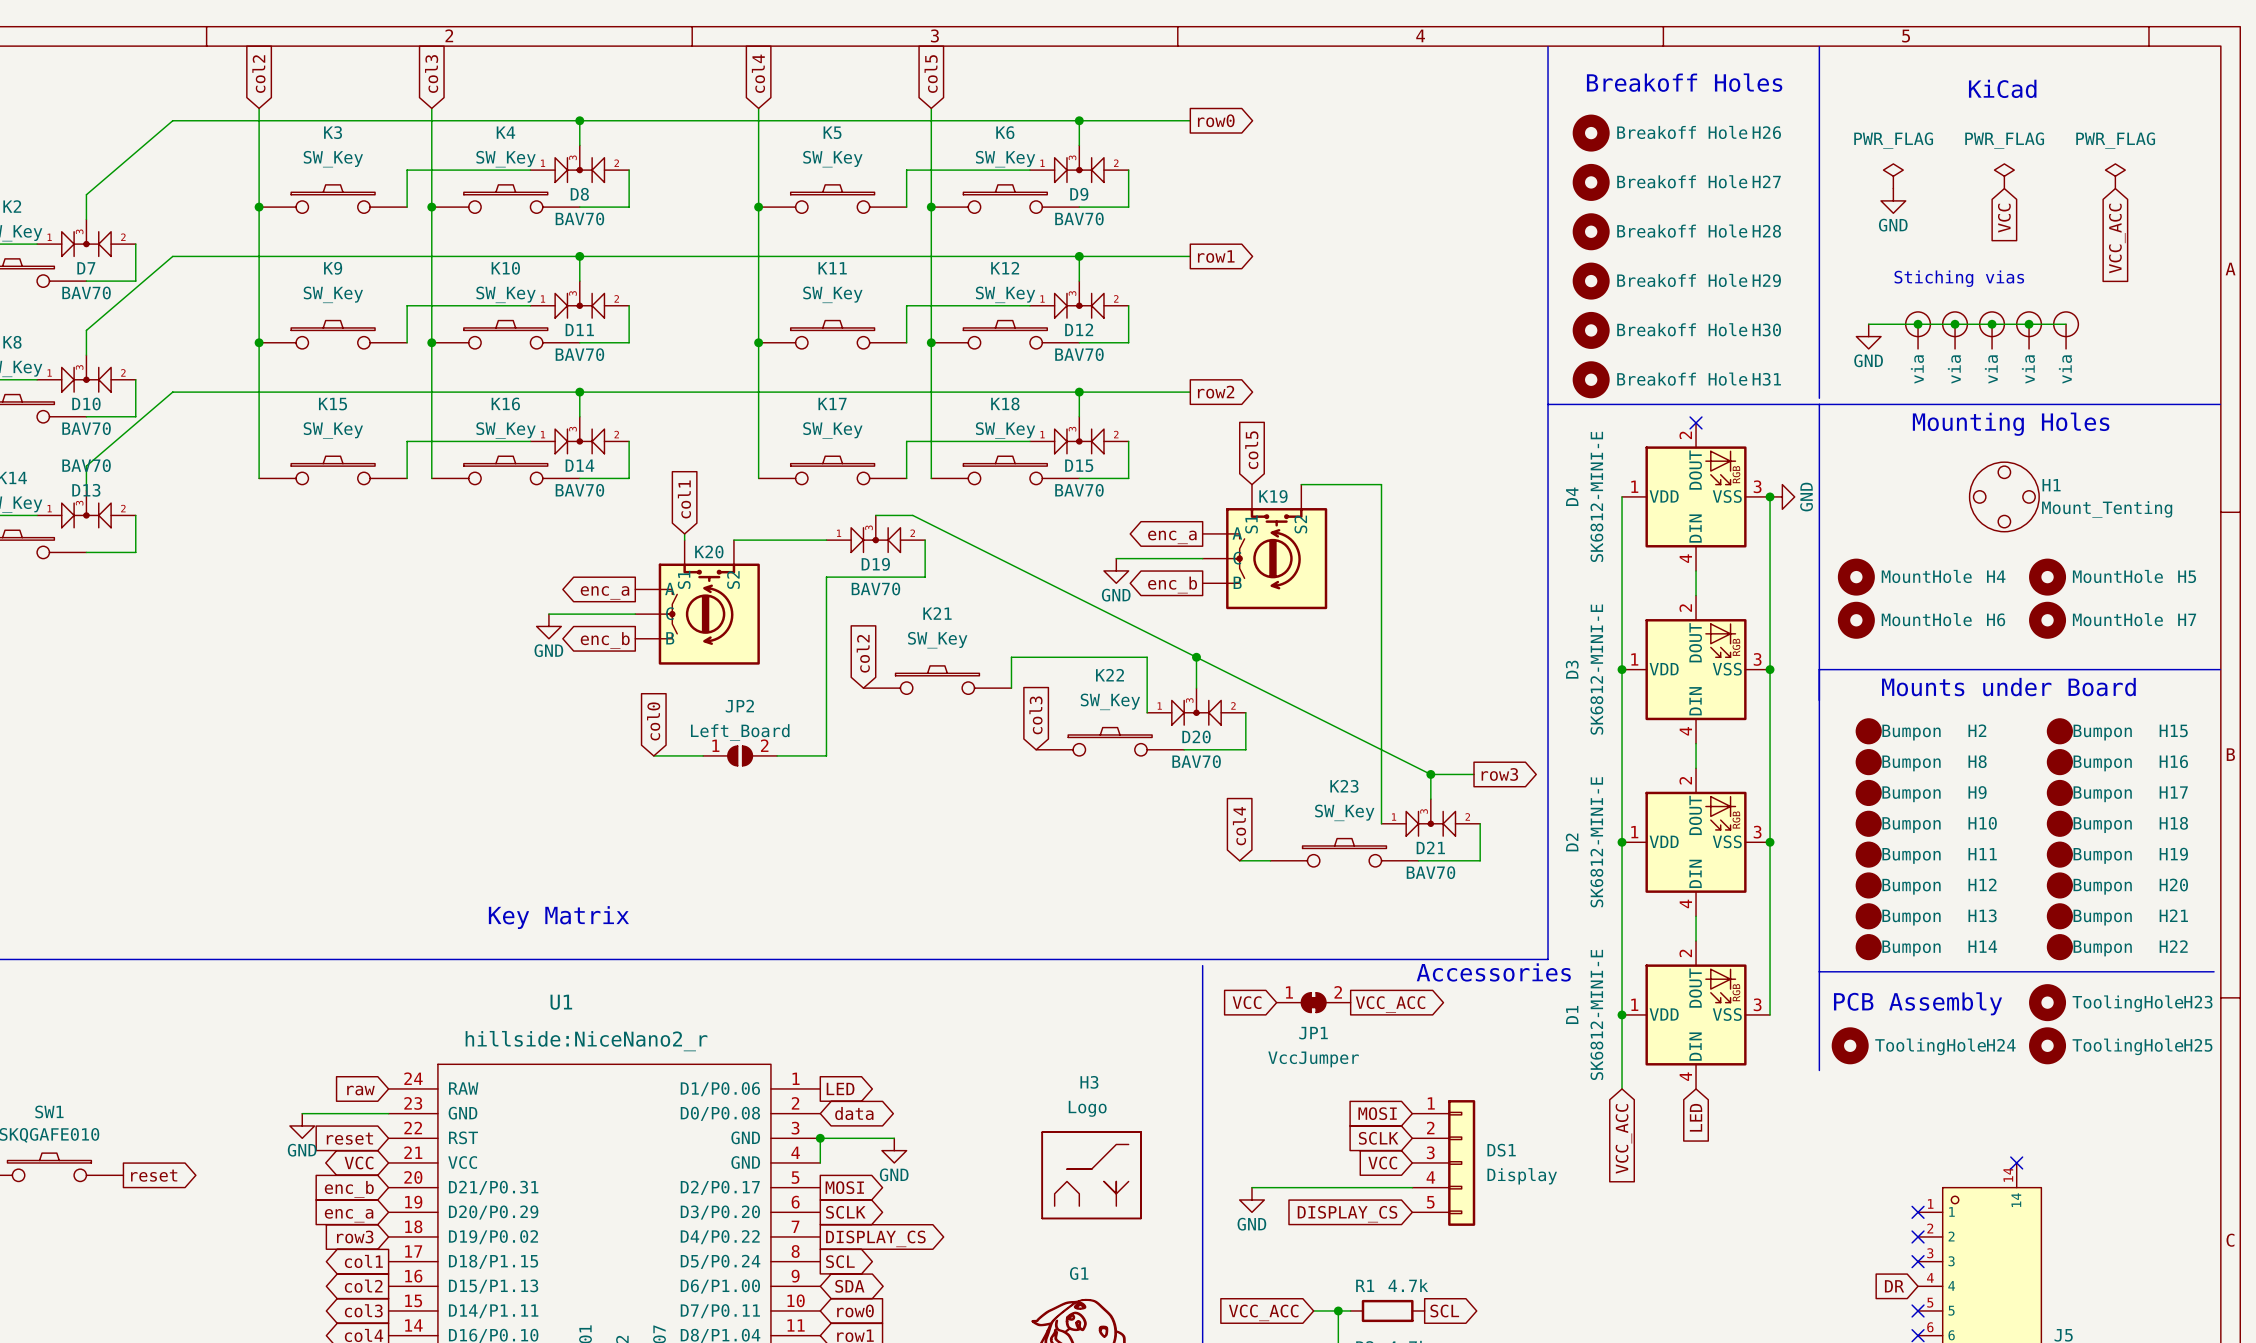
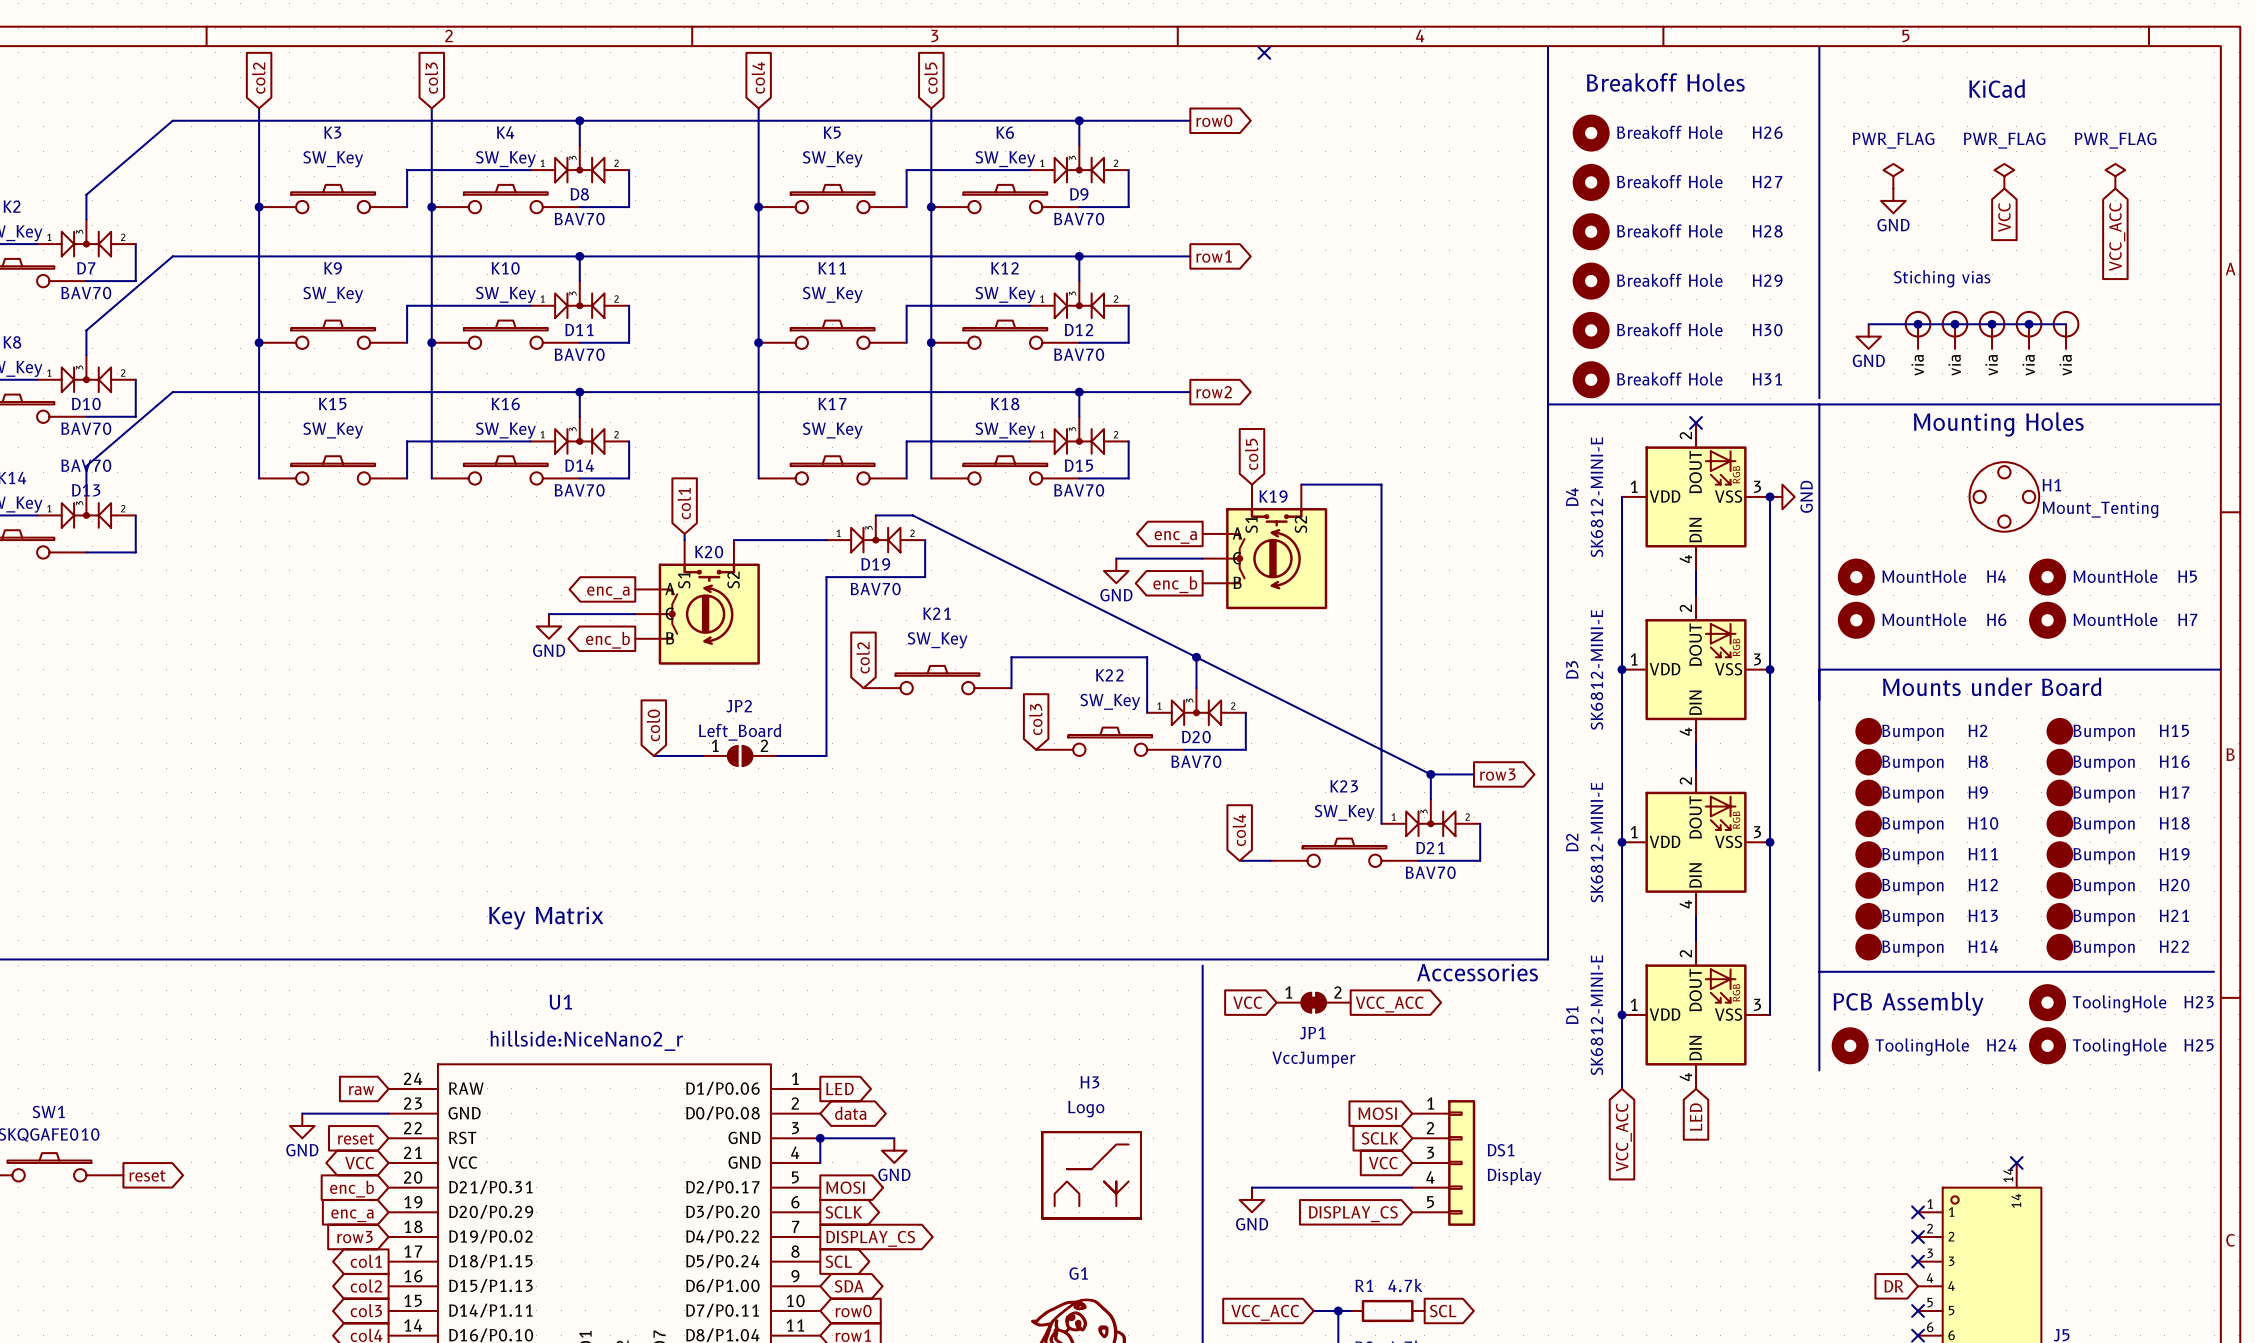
no-connect mark: none -> (1264, 52)

